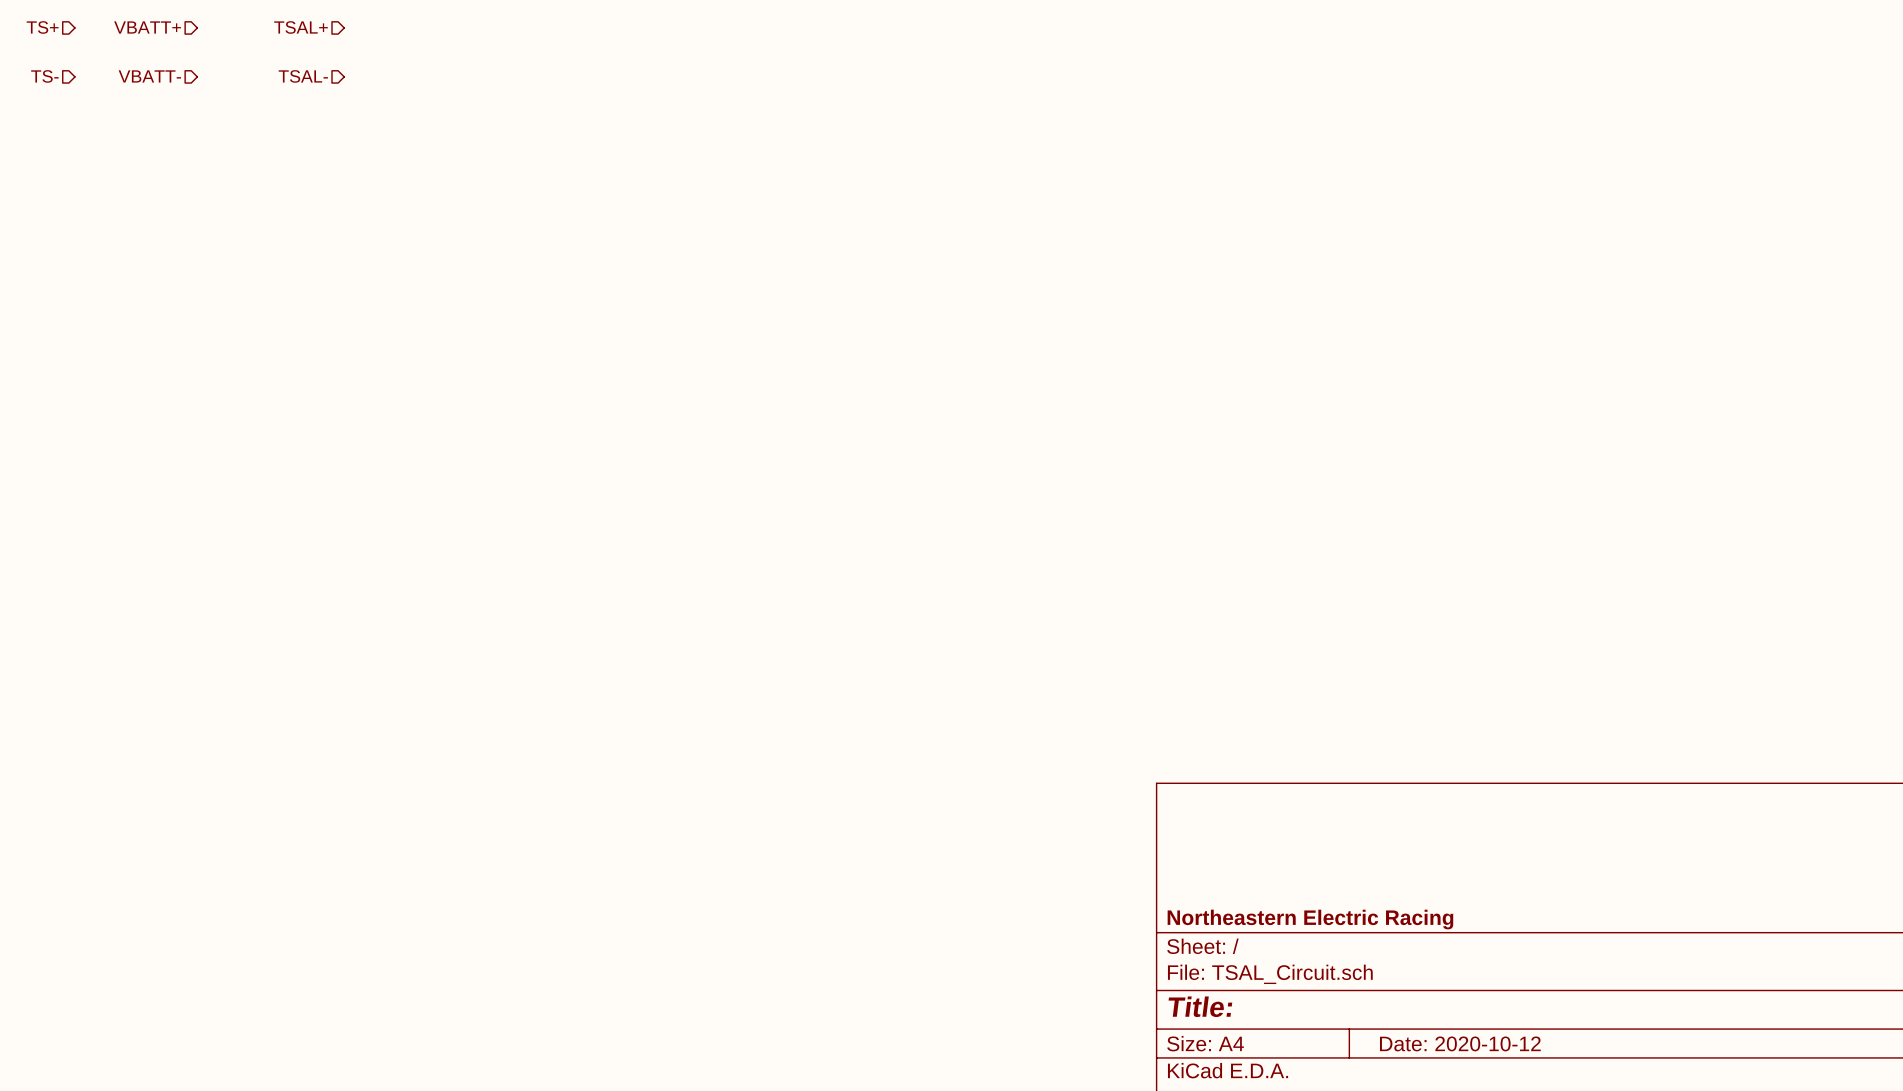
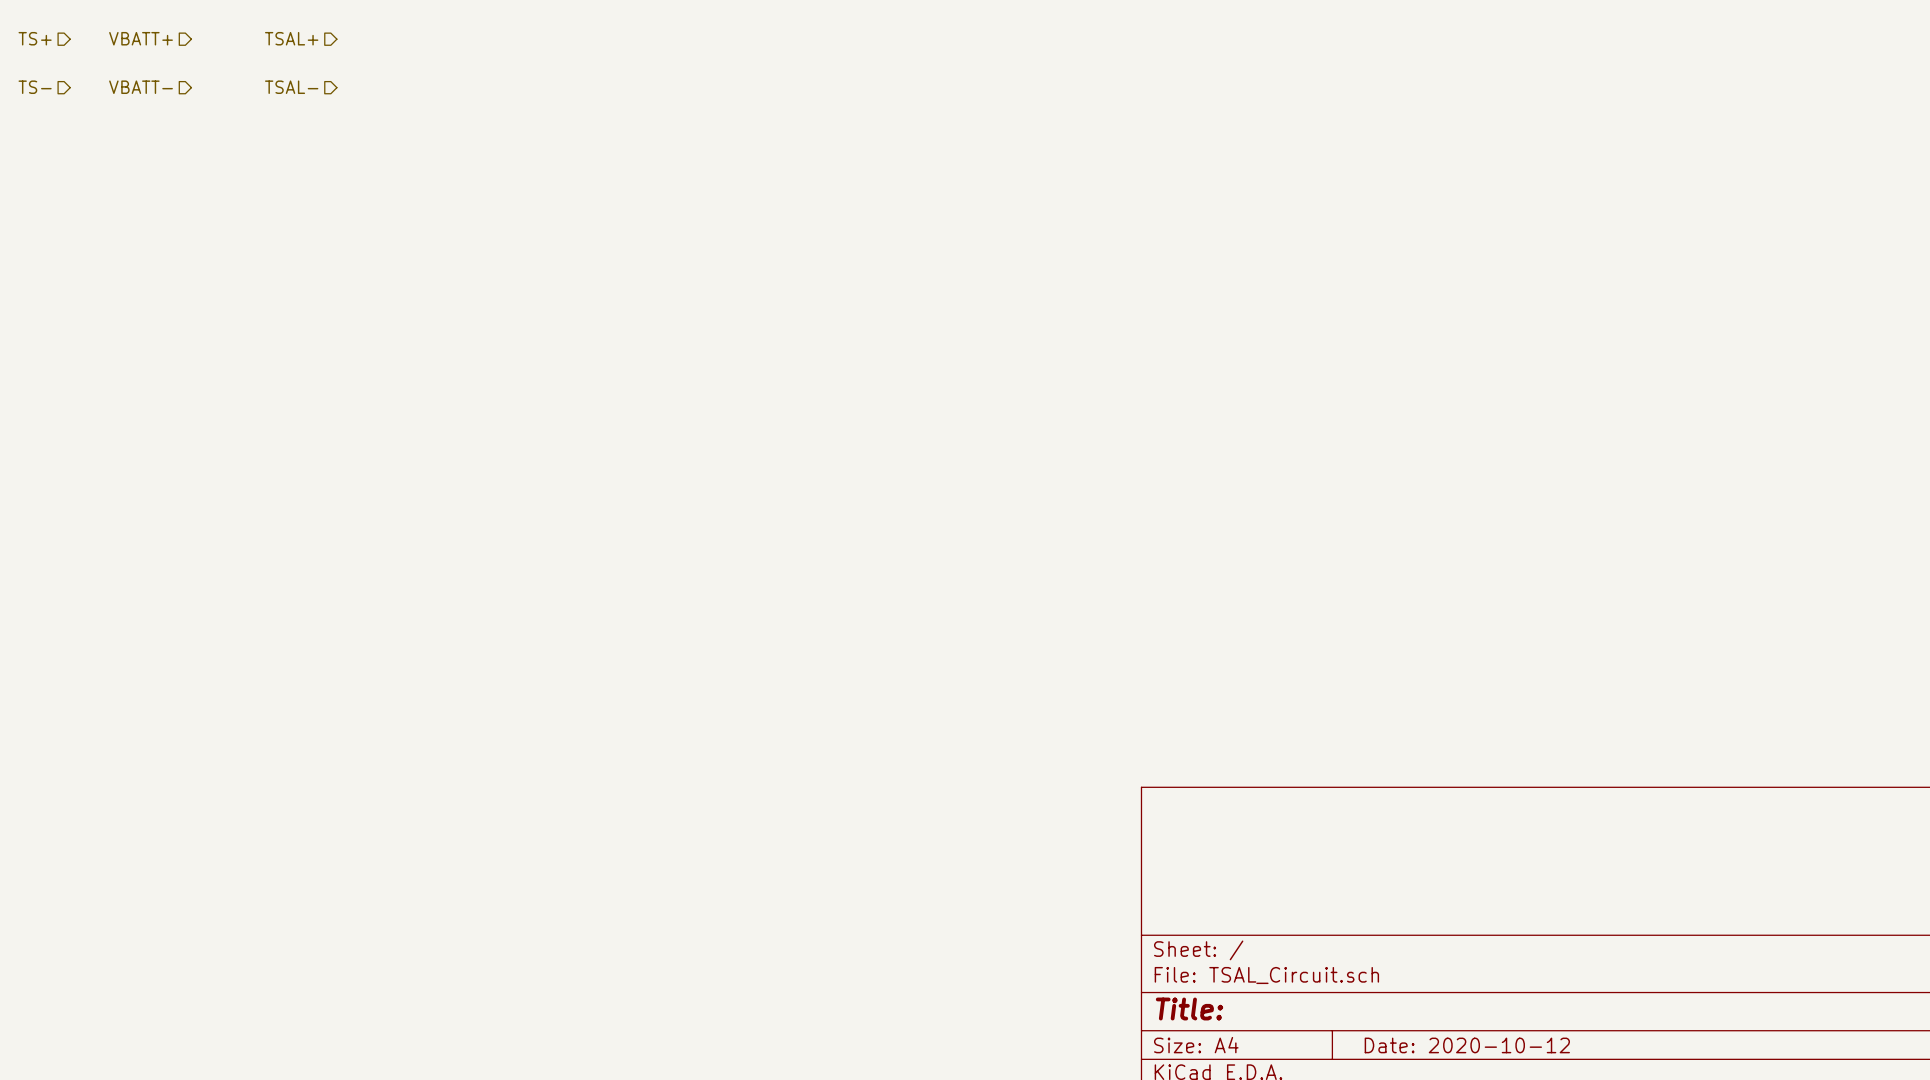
title block: Northeastern Electric Racing (1310, 919) -> none

